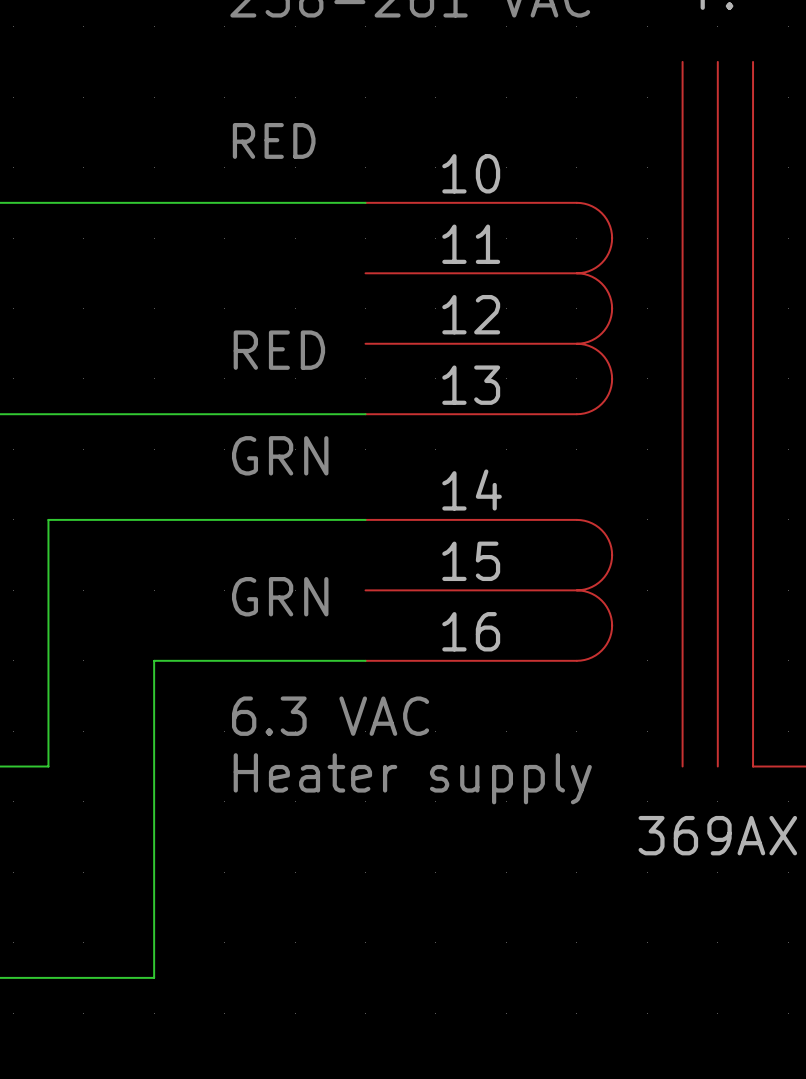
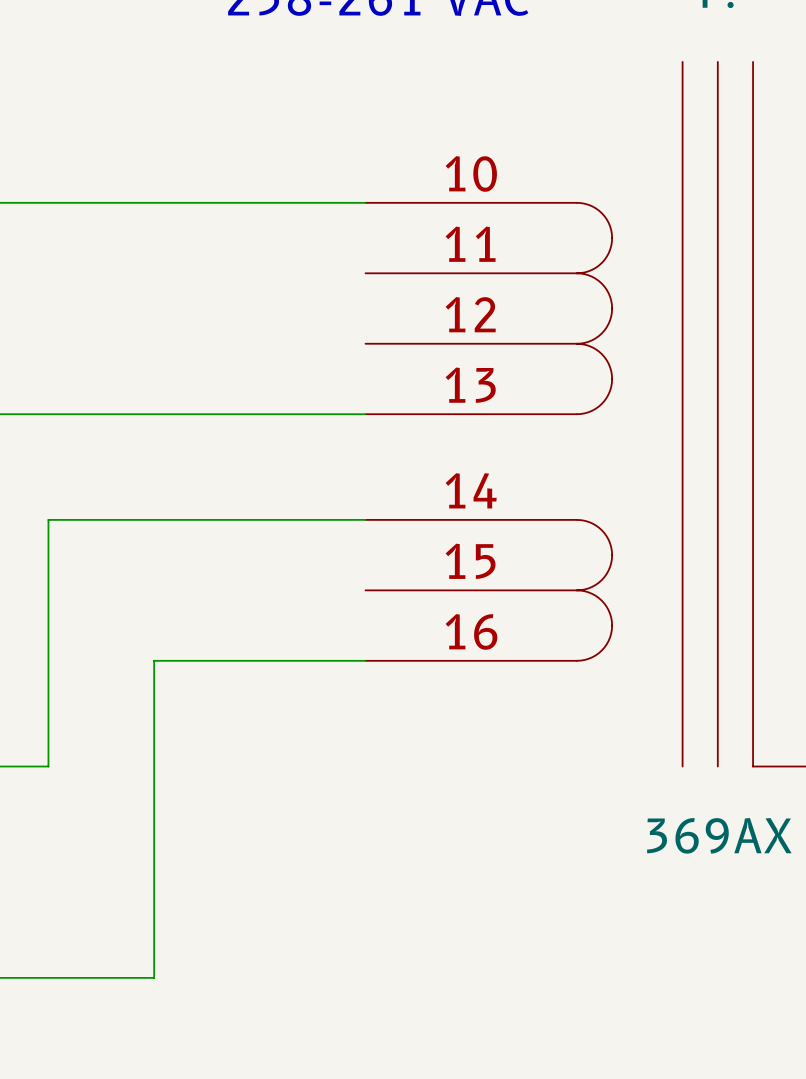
text: RED (274, 140) -> none
text: RED (279, 350) -> none
text: GRN (280, 455) -> none
text: GRN (280, 596) -> none
text: 6.3 VAC (330, 716) -> none
text: Heater supply (412, 778) -> none

